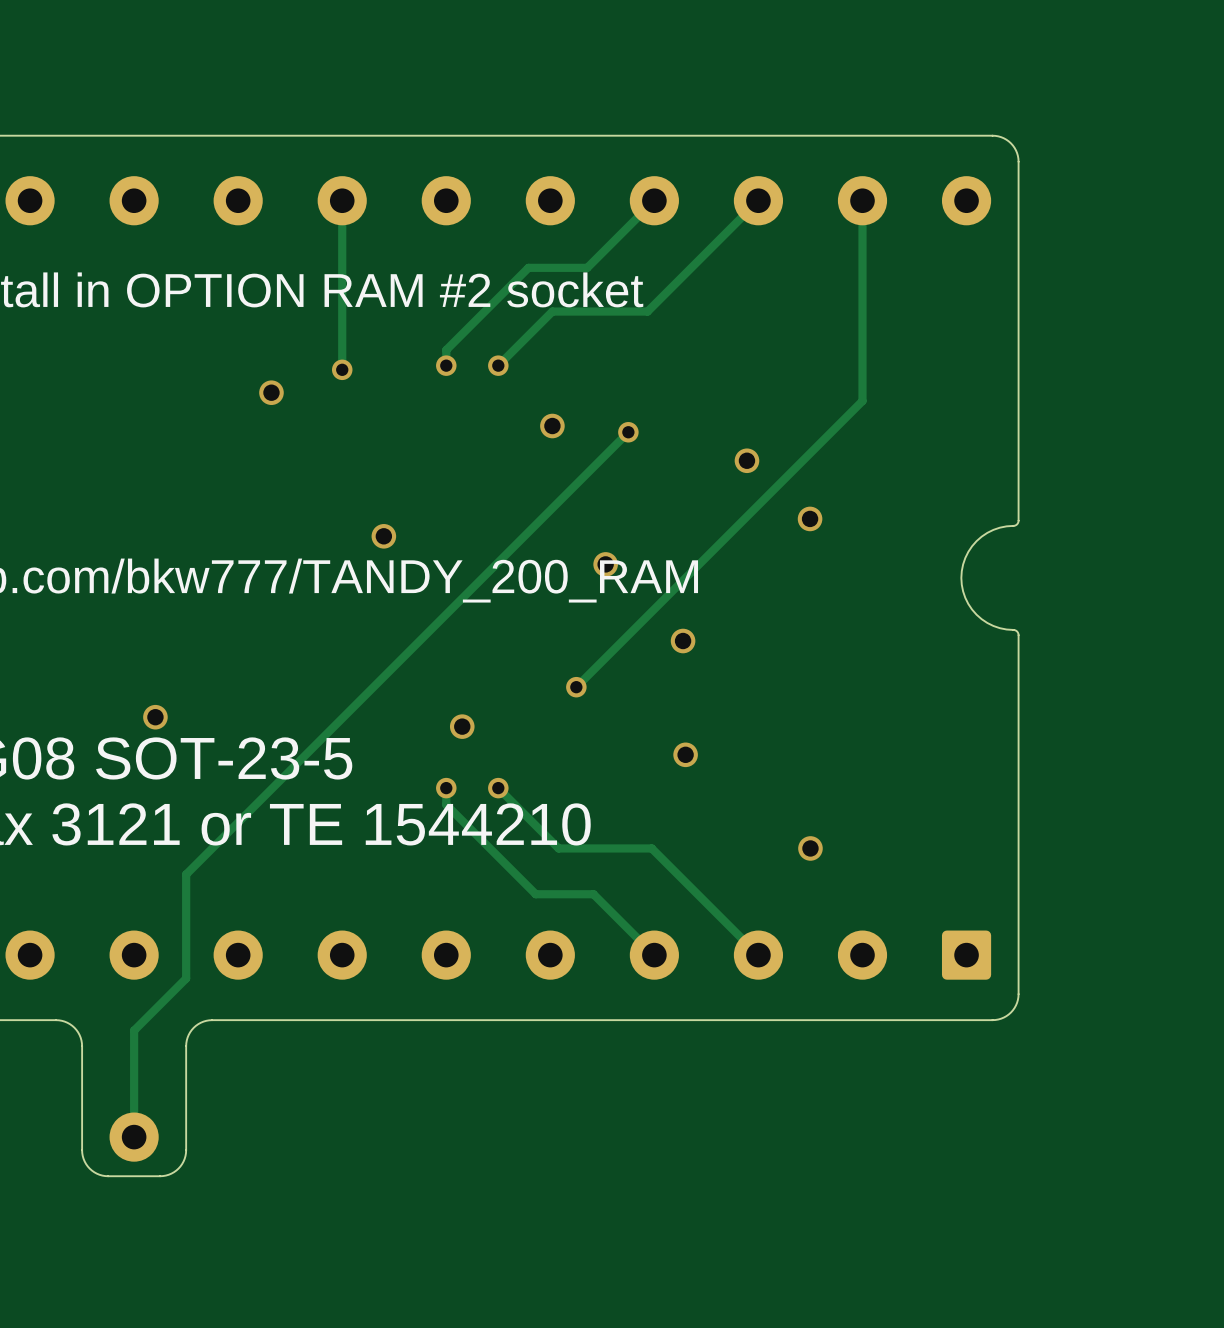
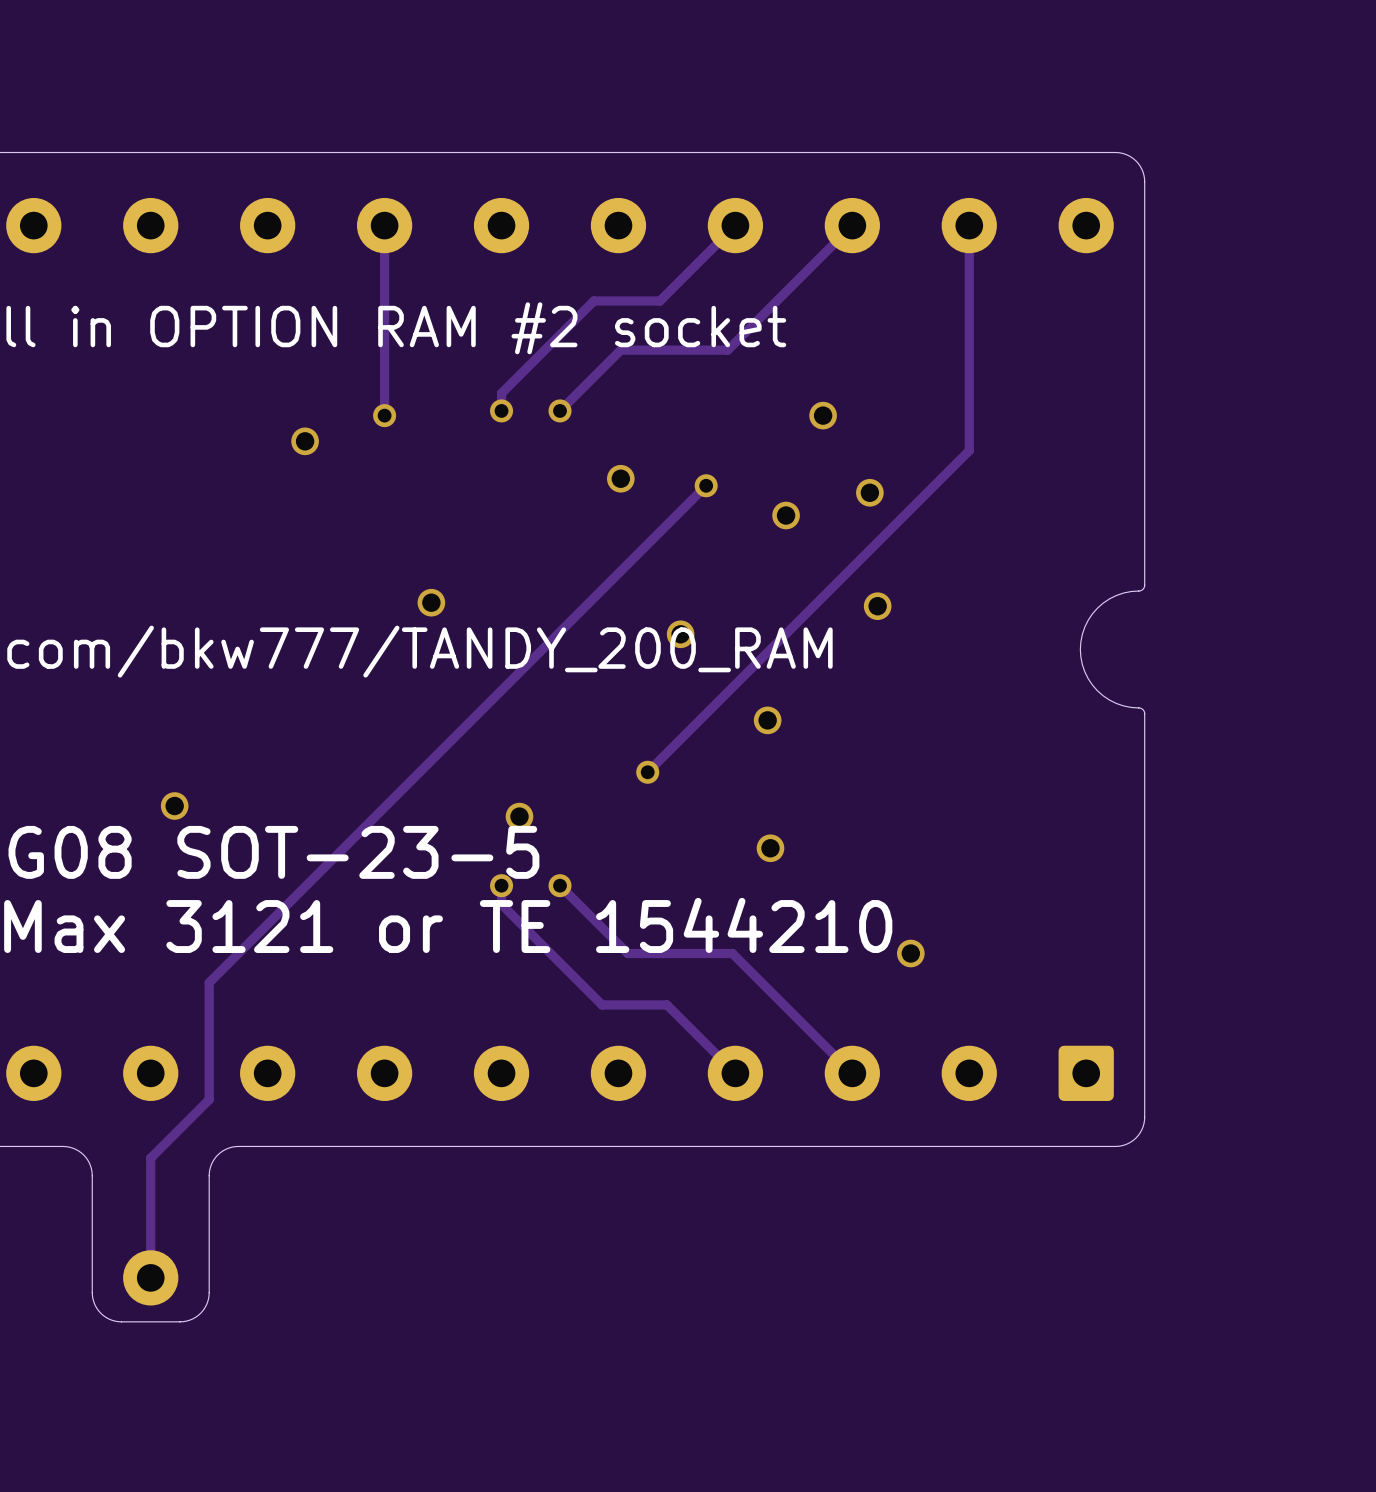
via: none -> (823, 415)
via: none -> (869, 492)
via: none -> (786, 515)
via: (746, 460) -> none
via position: (810, 518) -> (877, 606)

